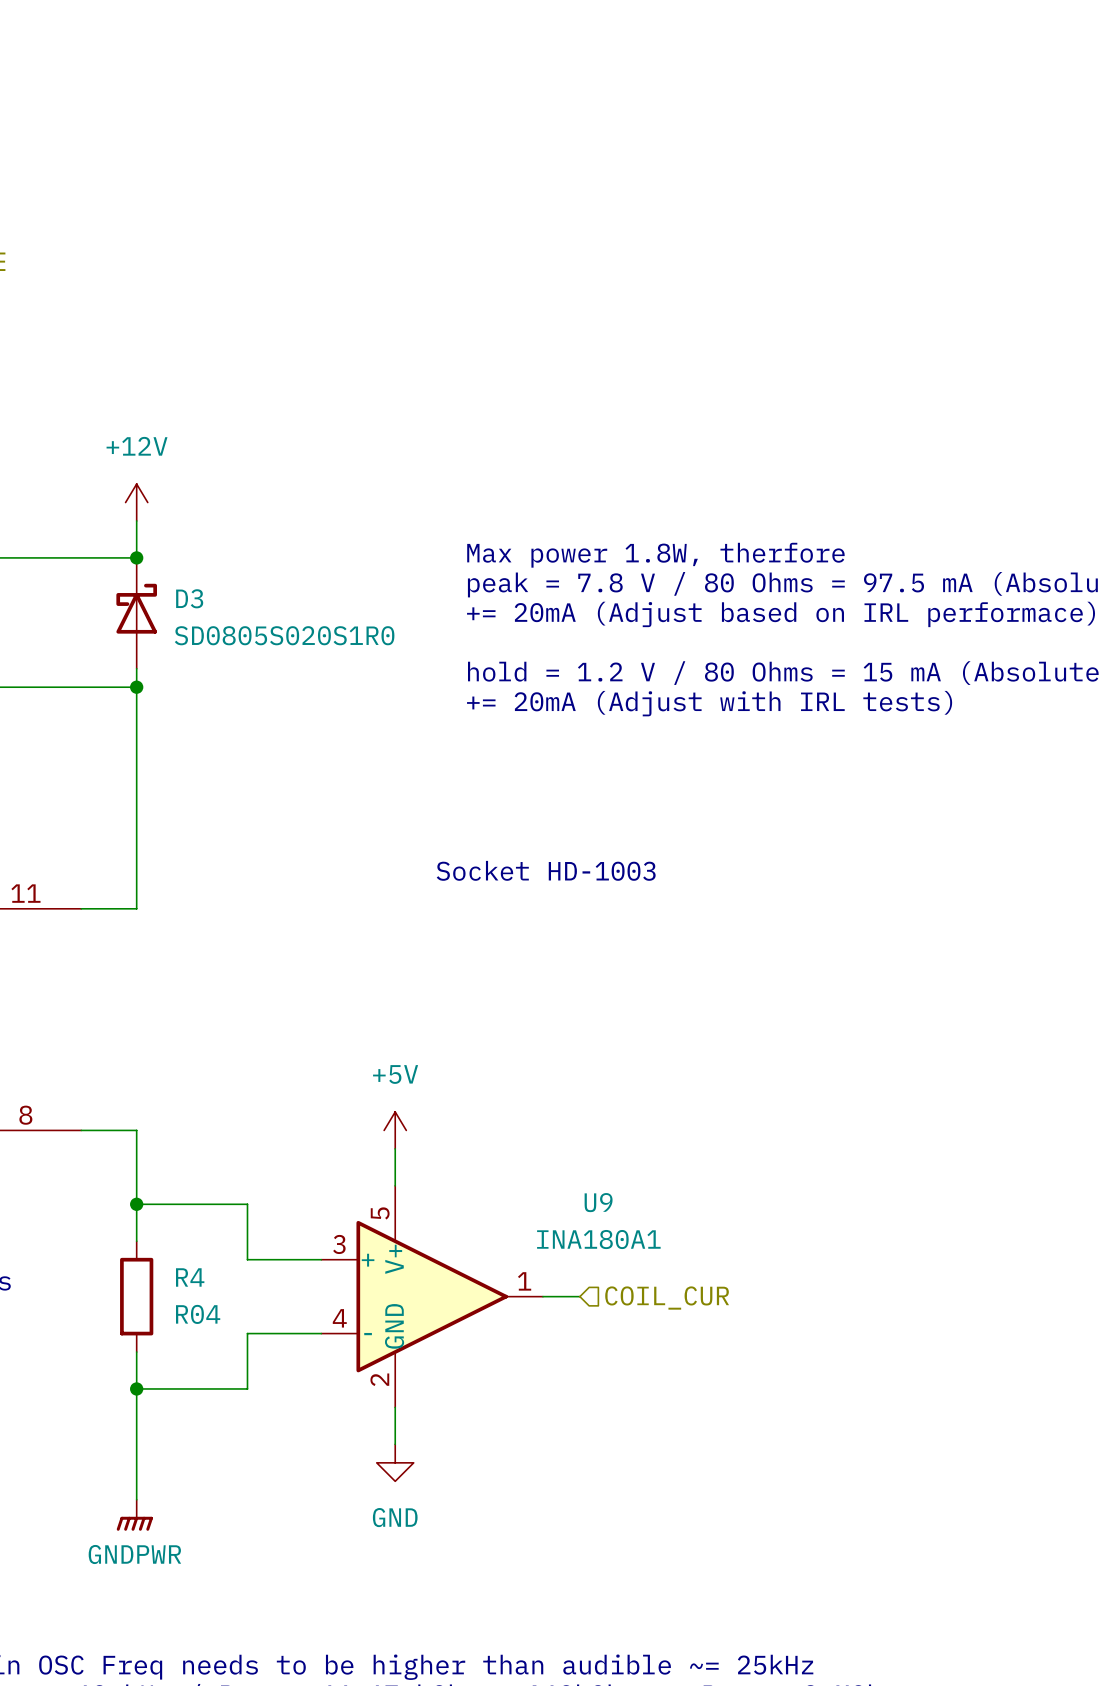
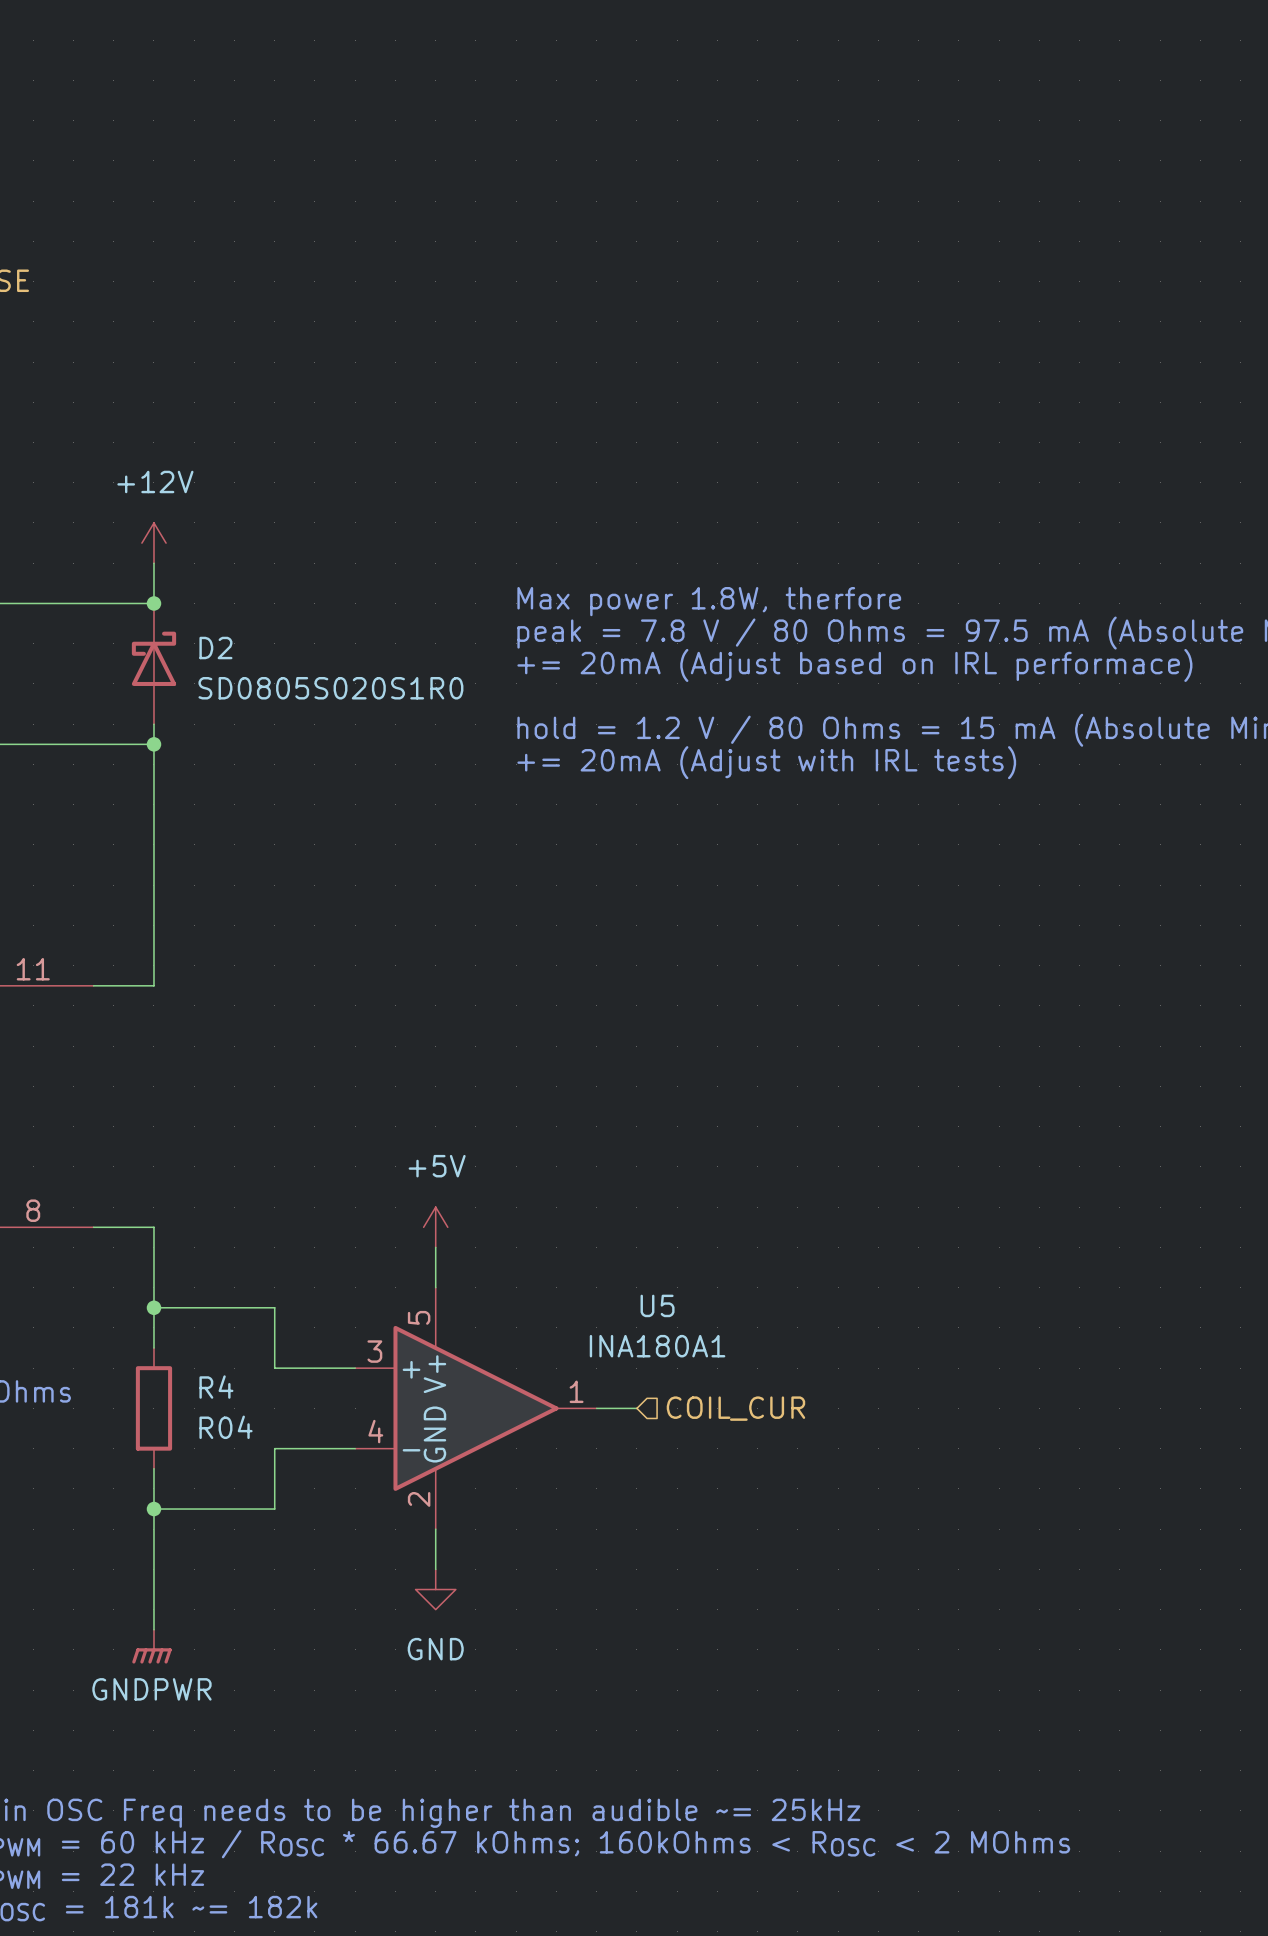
D3 name: D3 (189, 598) -> D2 (215, 648)
text: Socket HD-1003 (546, 870) -> none
U9 name: U9 (598, 1202) -> U5 (657, 1305)

